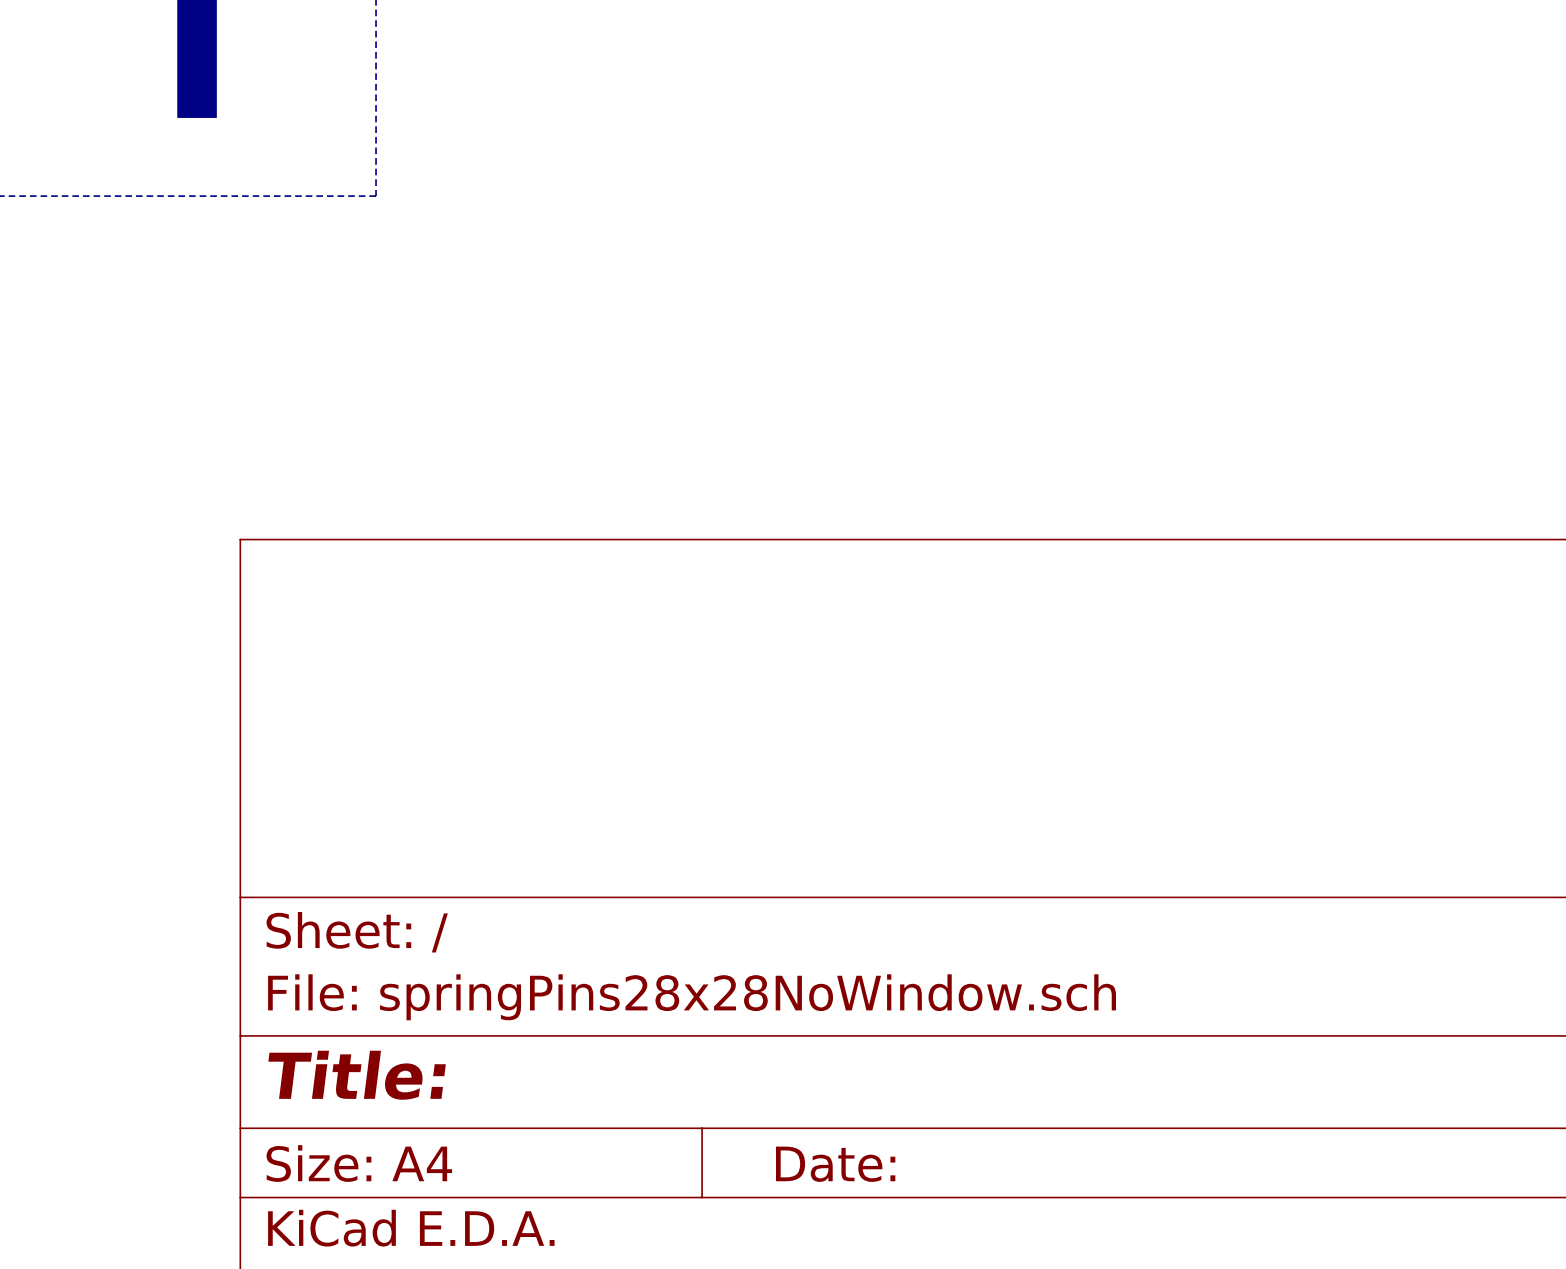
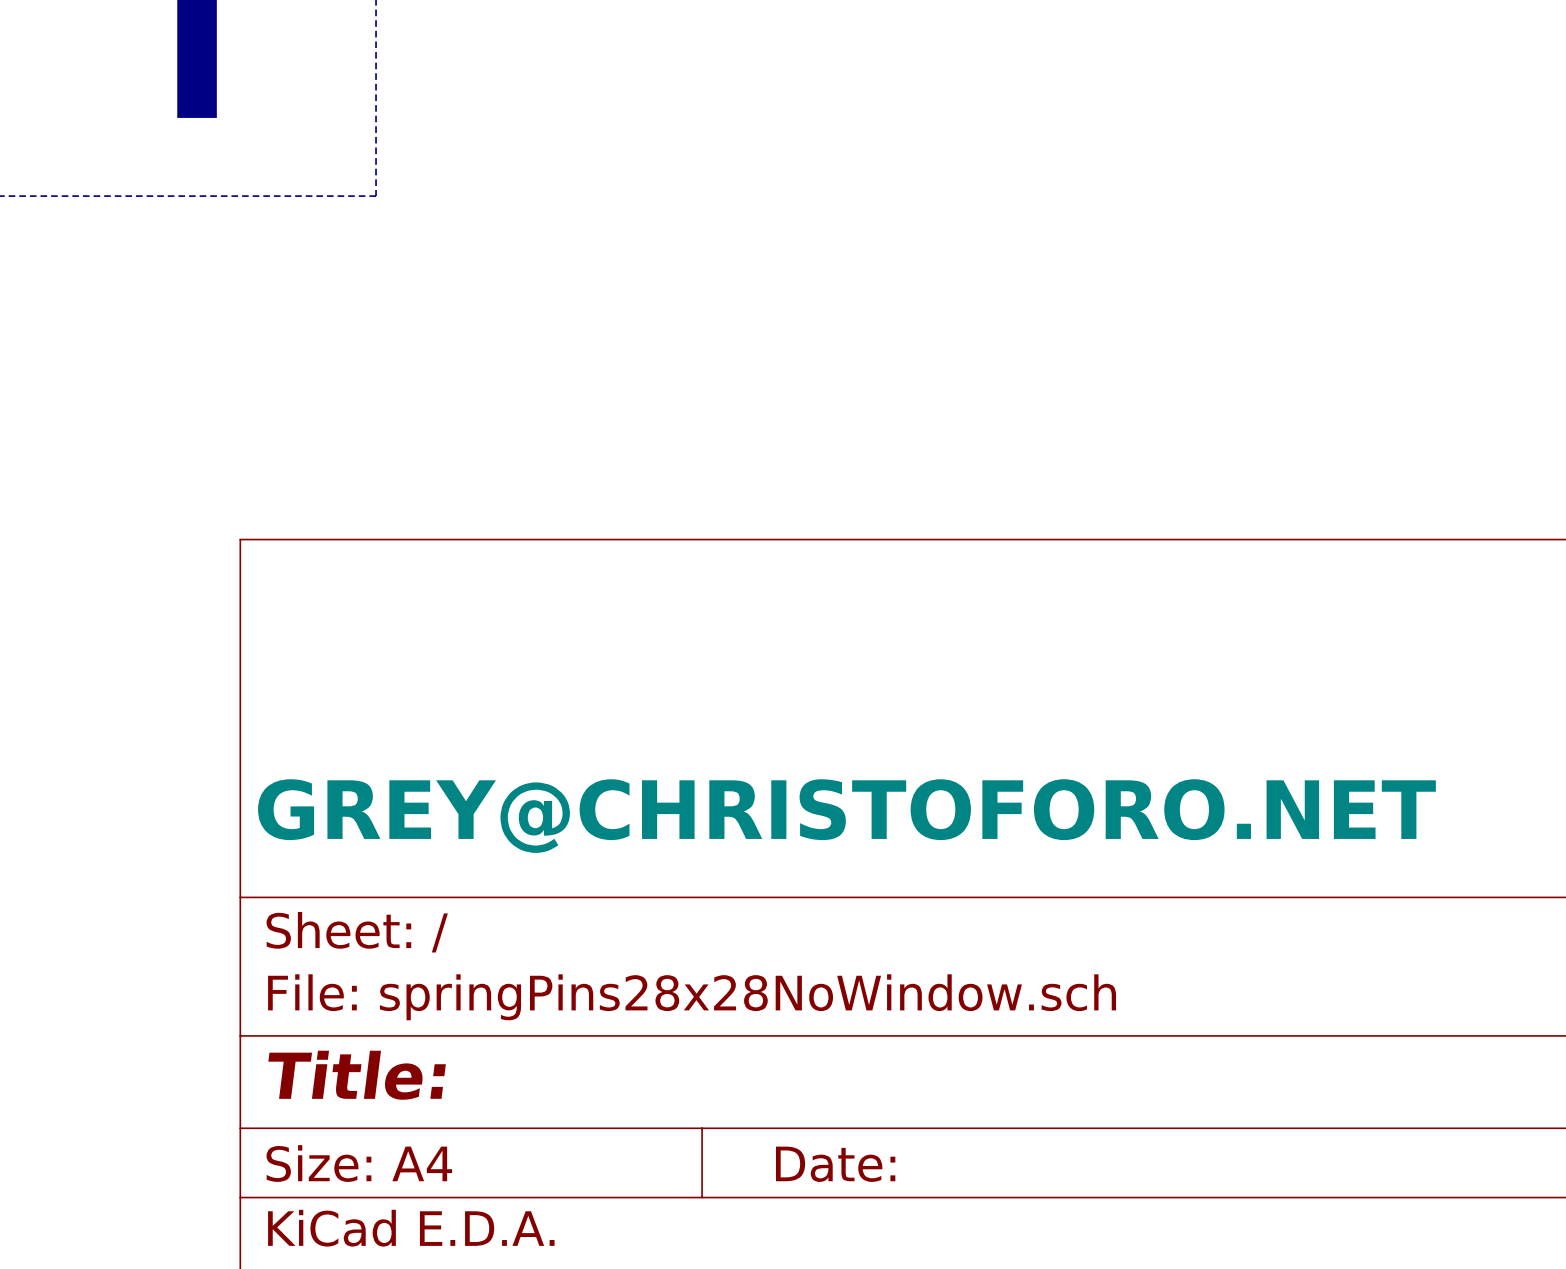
part: none -> GREY@CHRISTOFORO.NET (846, 816)

